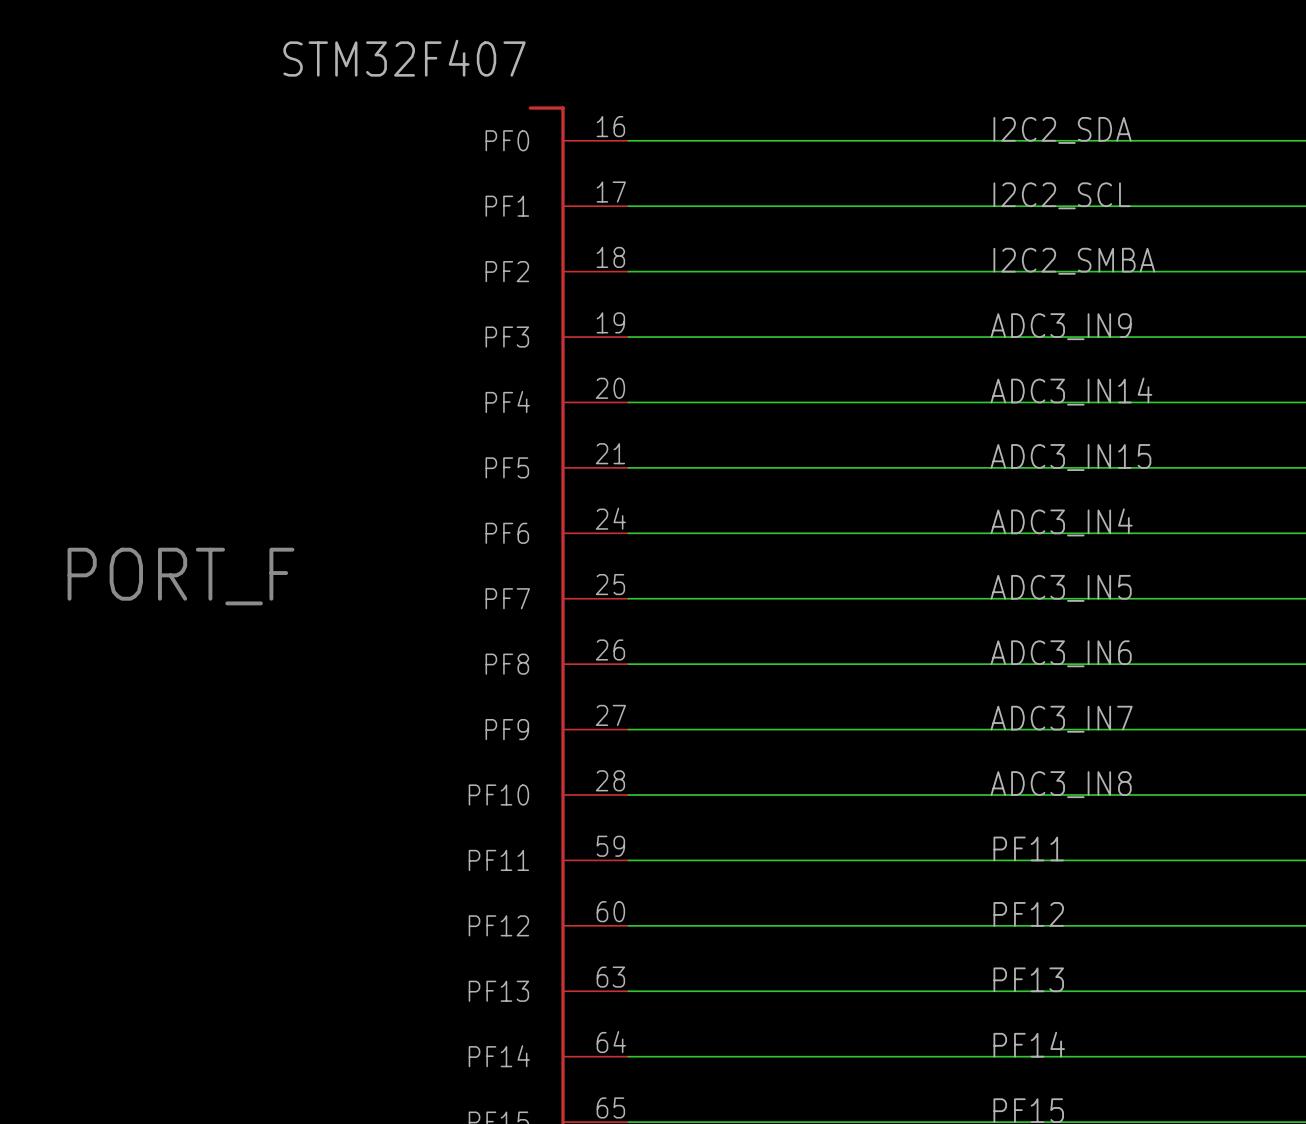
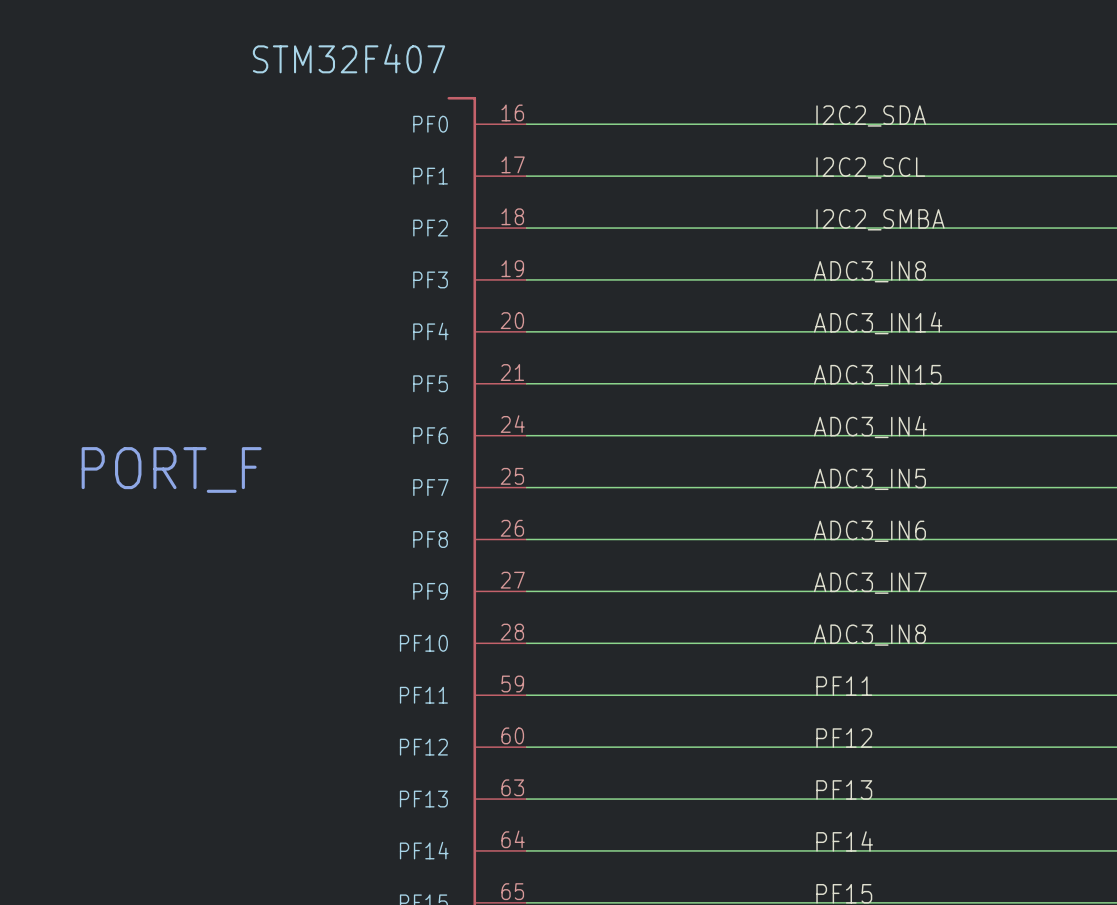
label: ADC3_IN9 (1061, 326) -> ADC3_IN8 (869, 271)

